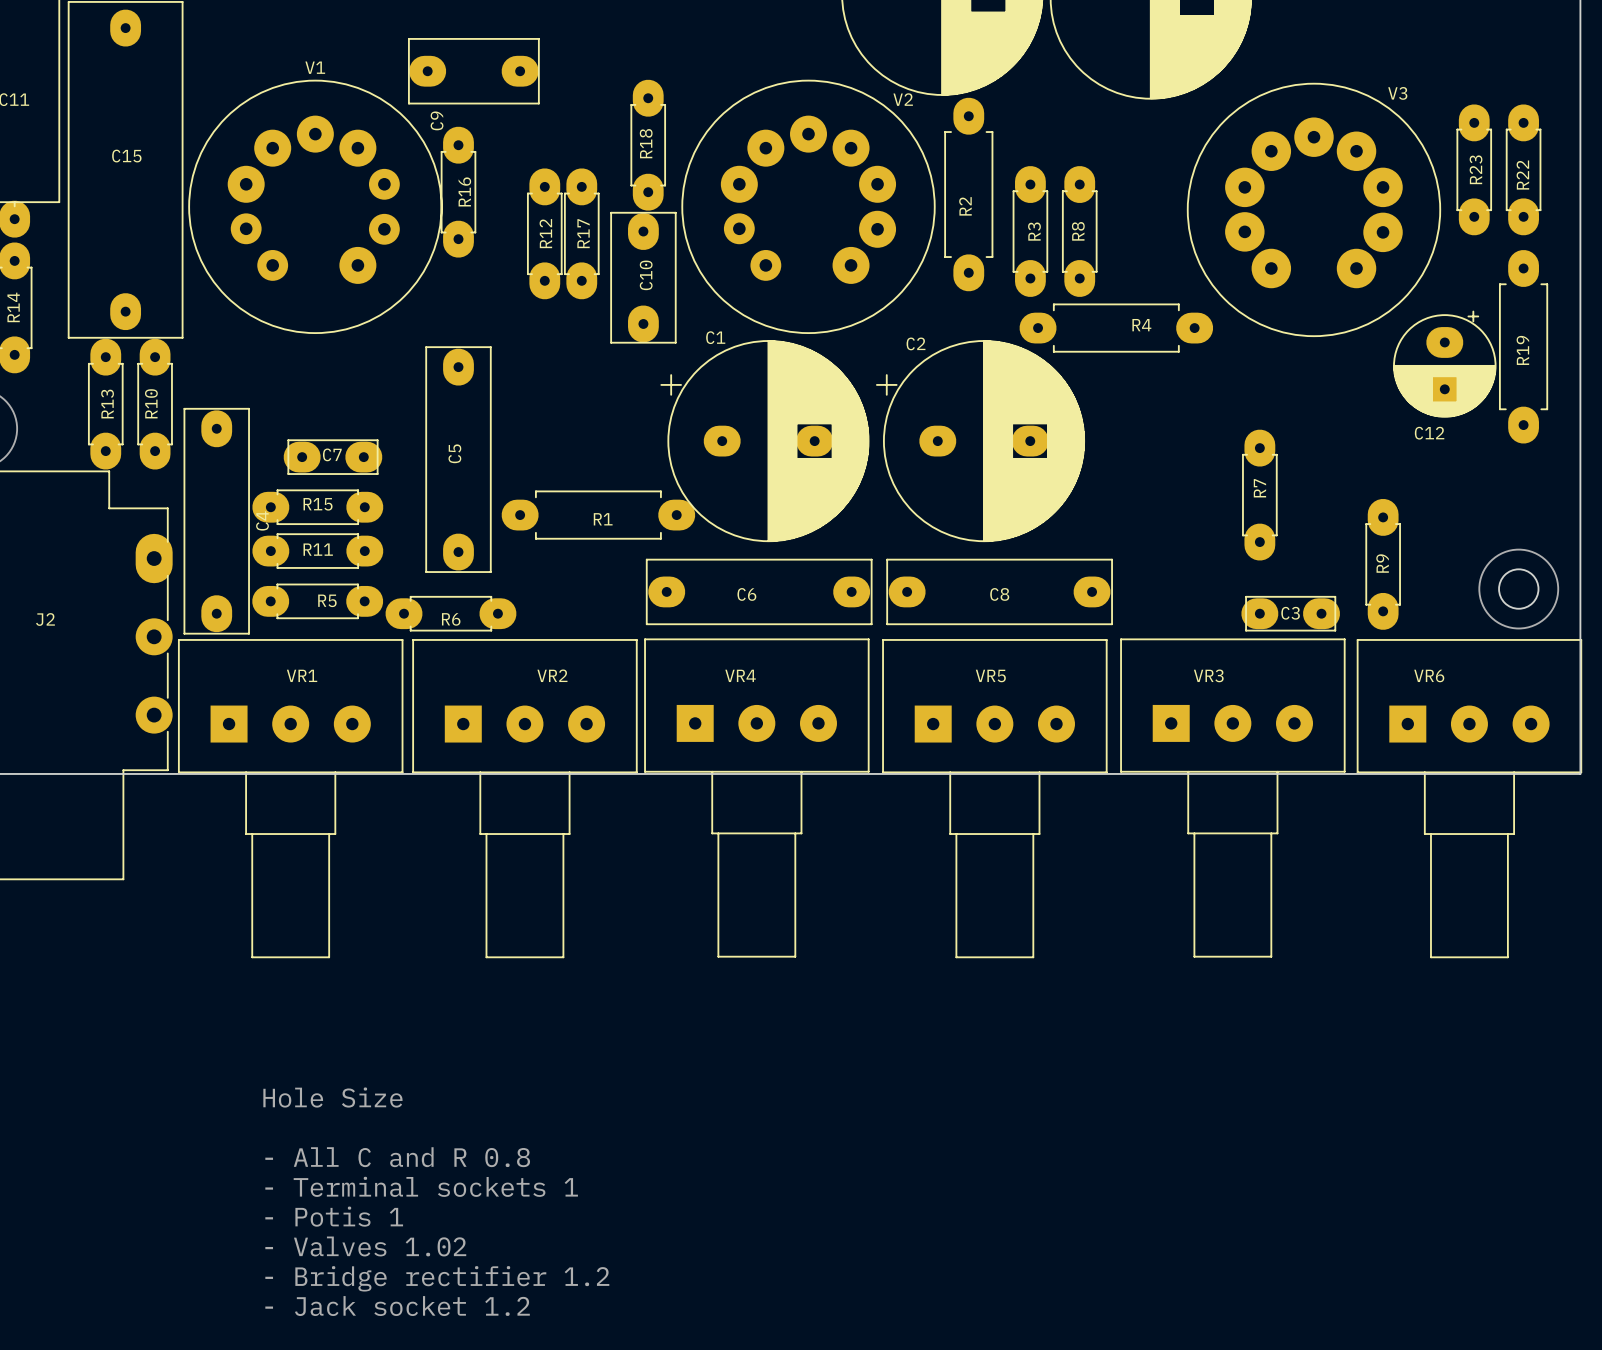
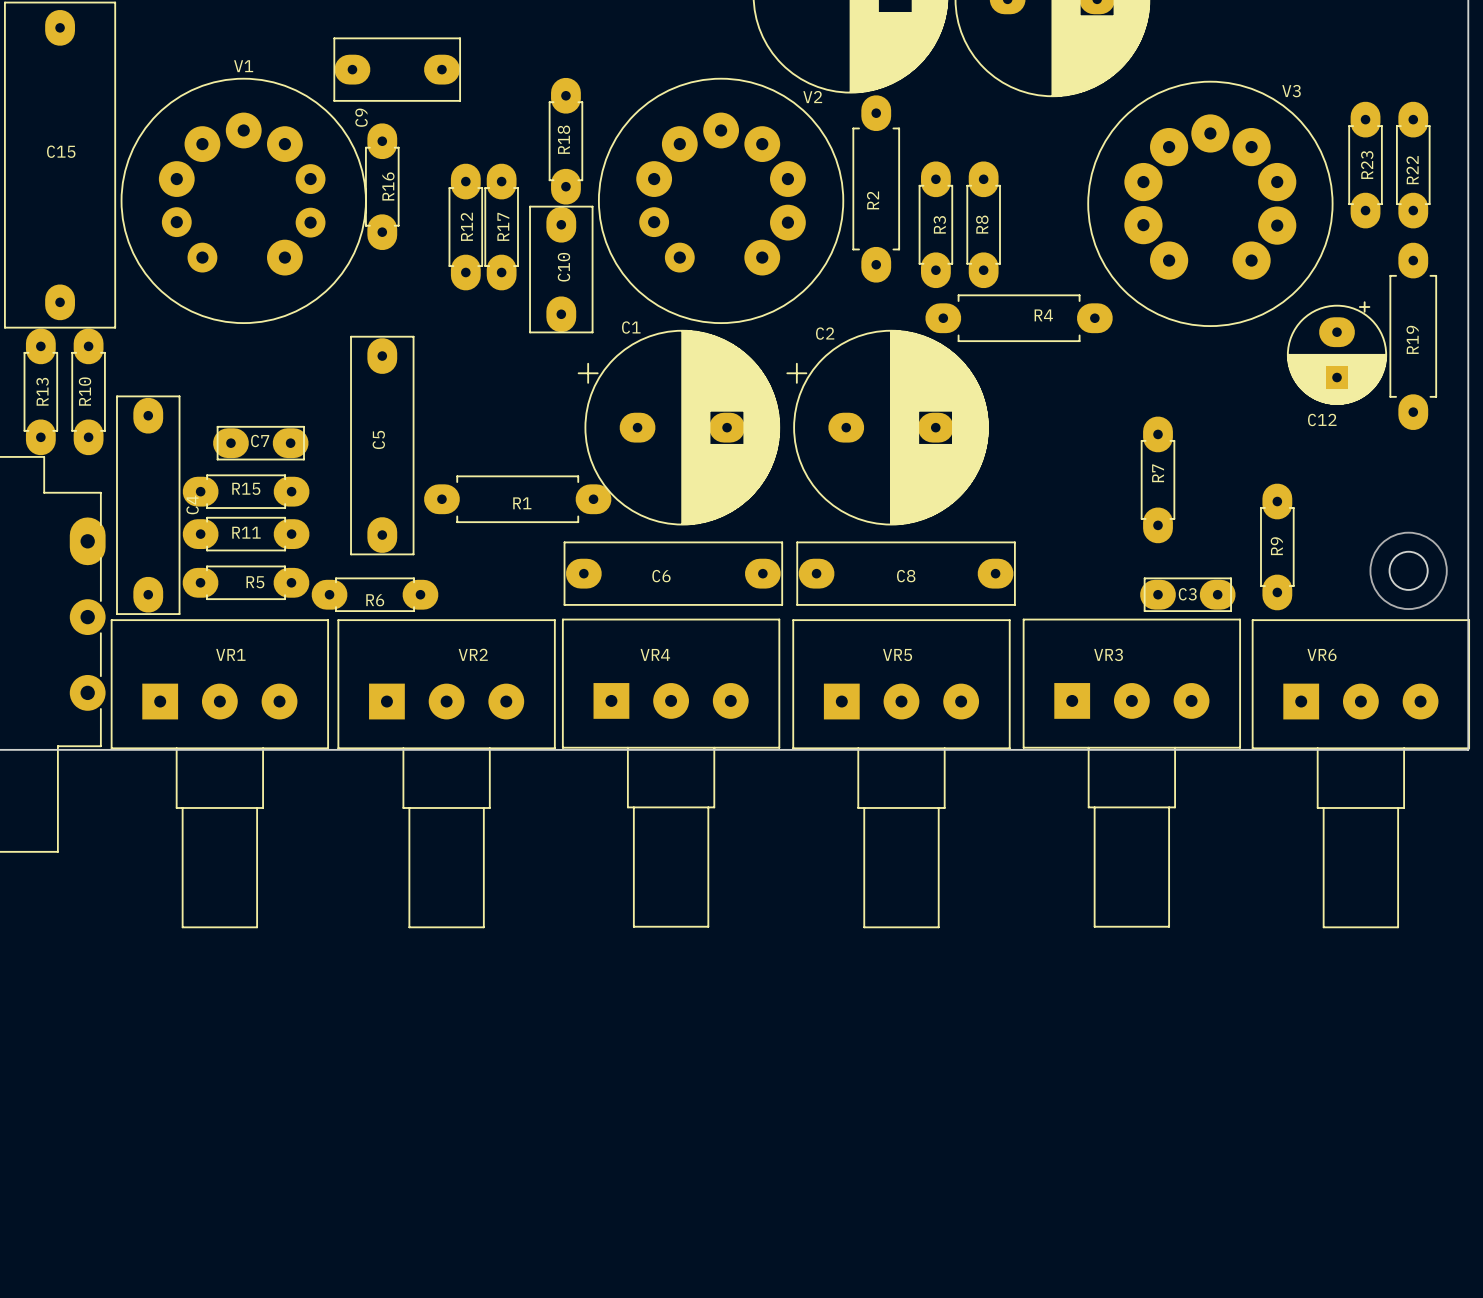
text: Hole Size (332, 1097) -> none
text: - All C and R 0.8 (397, 1157) -> none
text: - Terminal sockets 1 (421, 1186) -> none
text: - Potis 1 (334, 1216) -> none
text: - Valves 1.02 (365, 1246) -> none
text: - Bridge rectifier 1.2 (437, 1278) -> none
text: - Jack socket 1.2 (397, 1306) -> none

